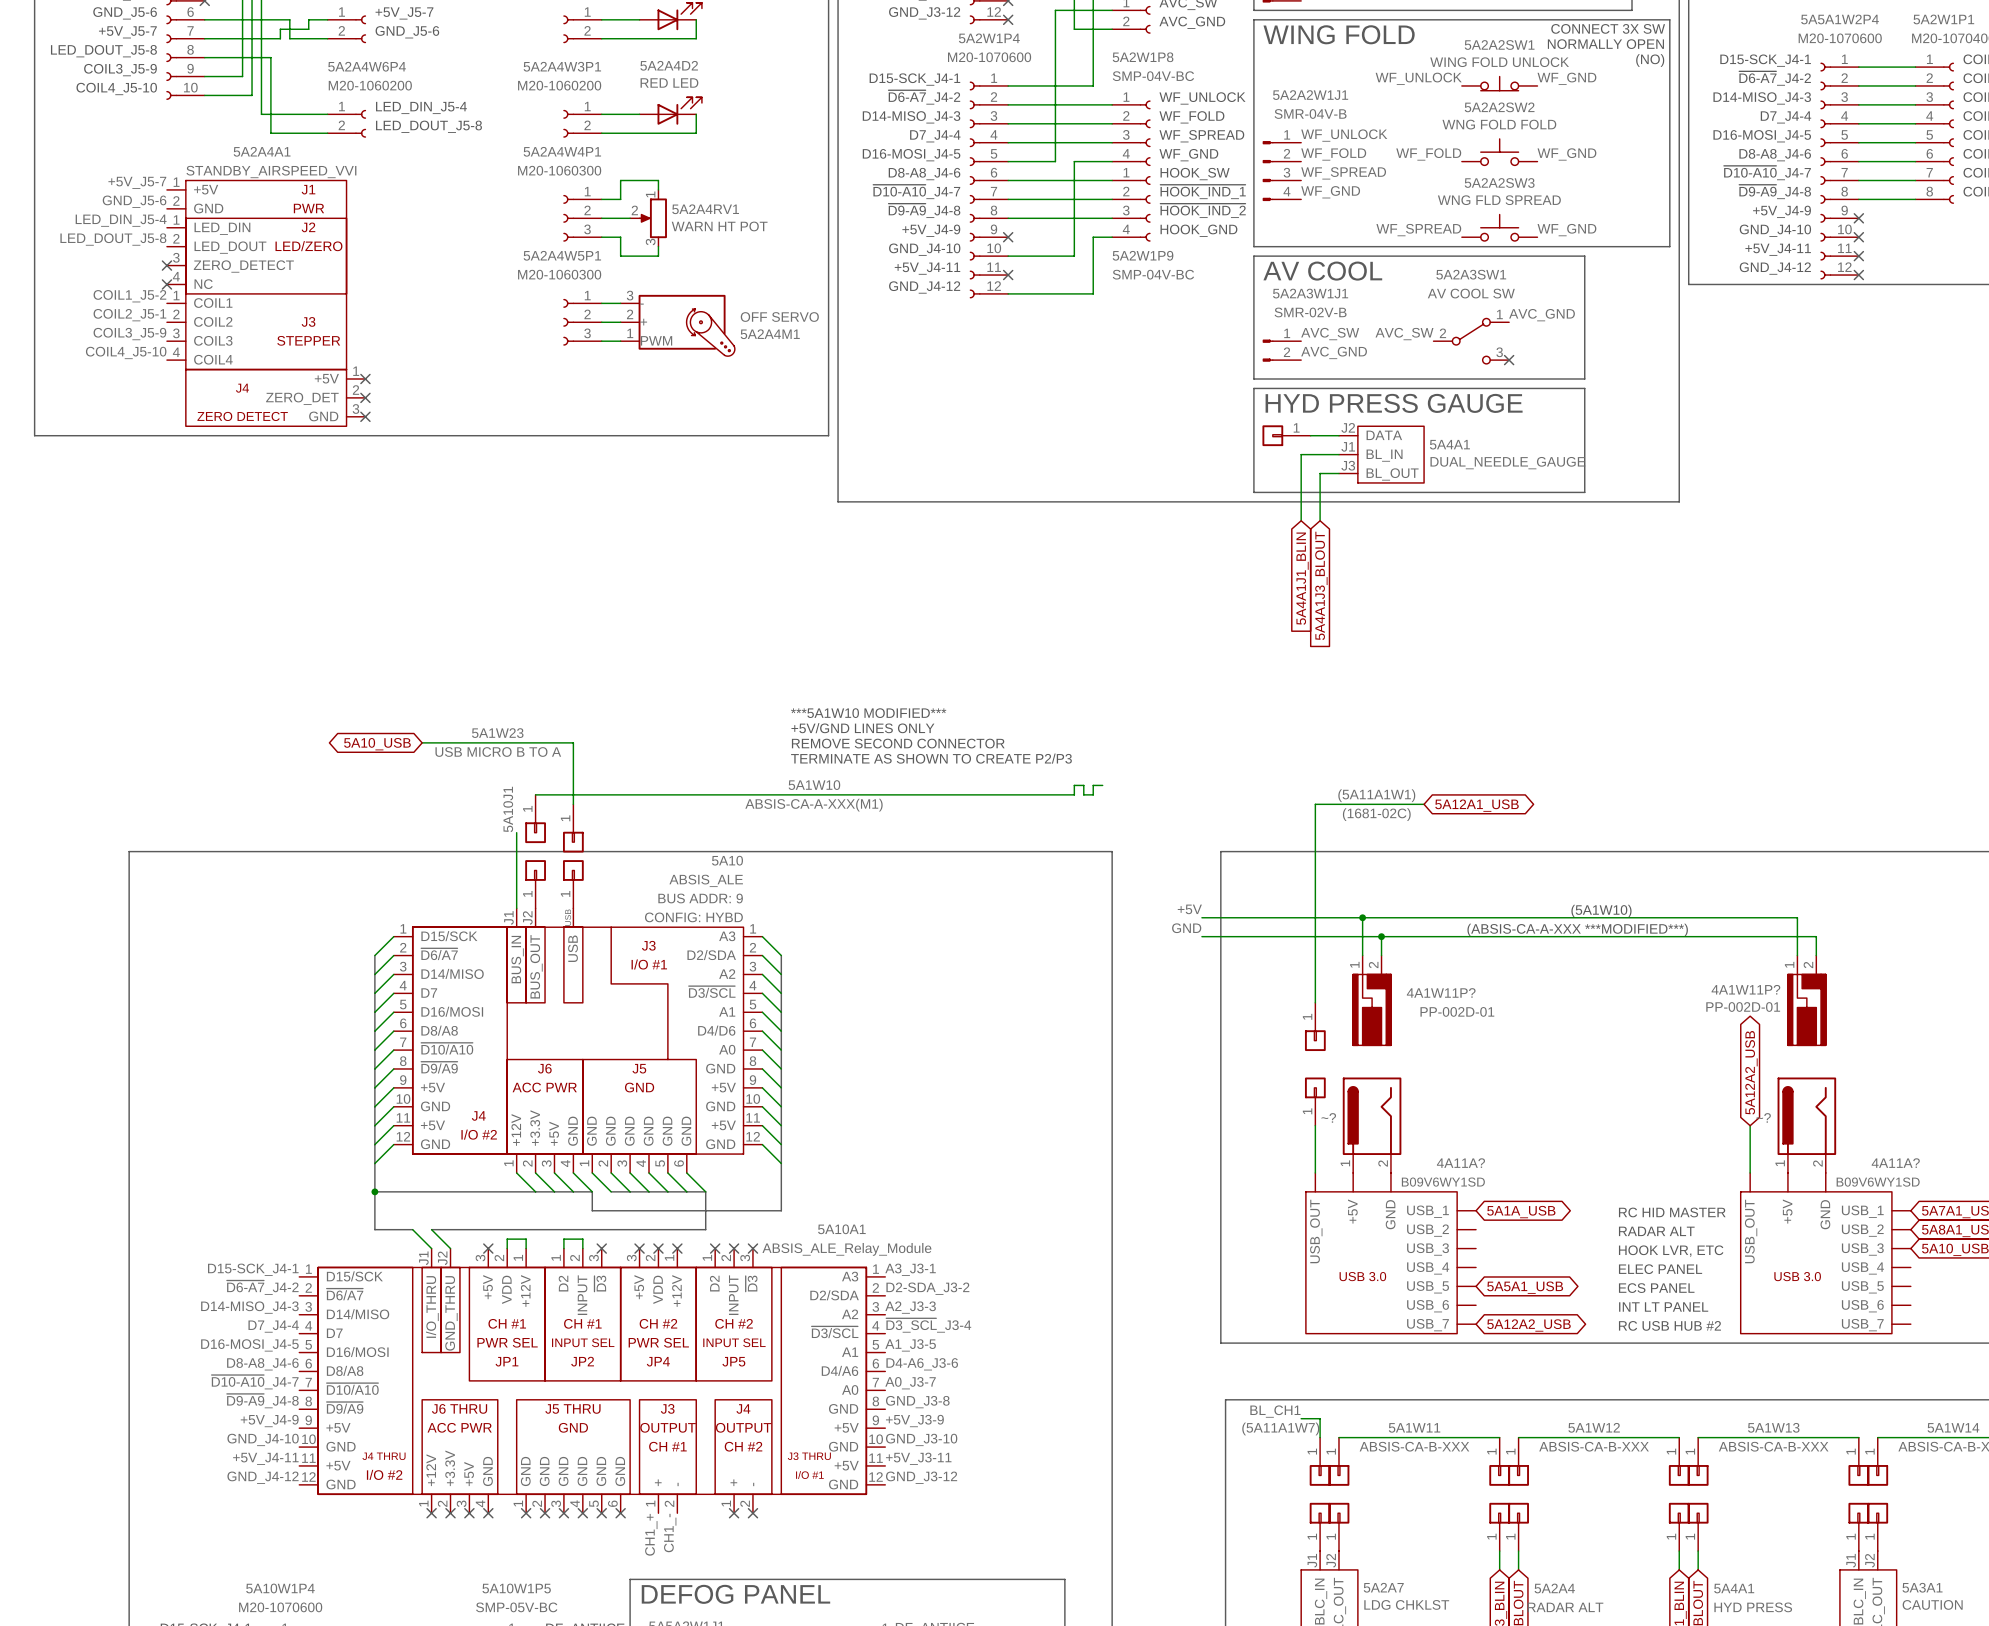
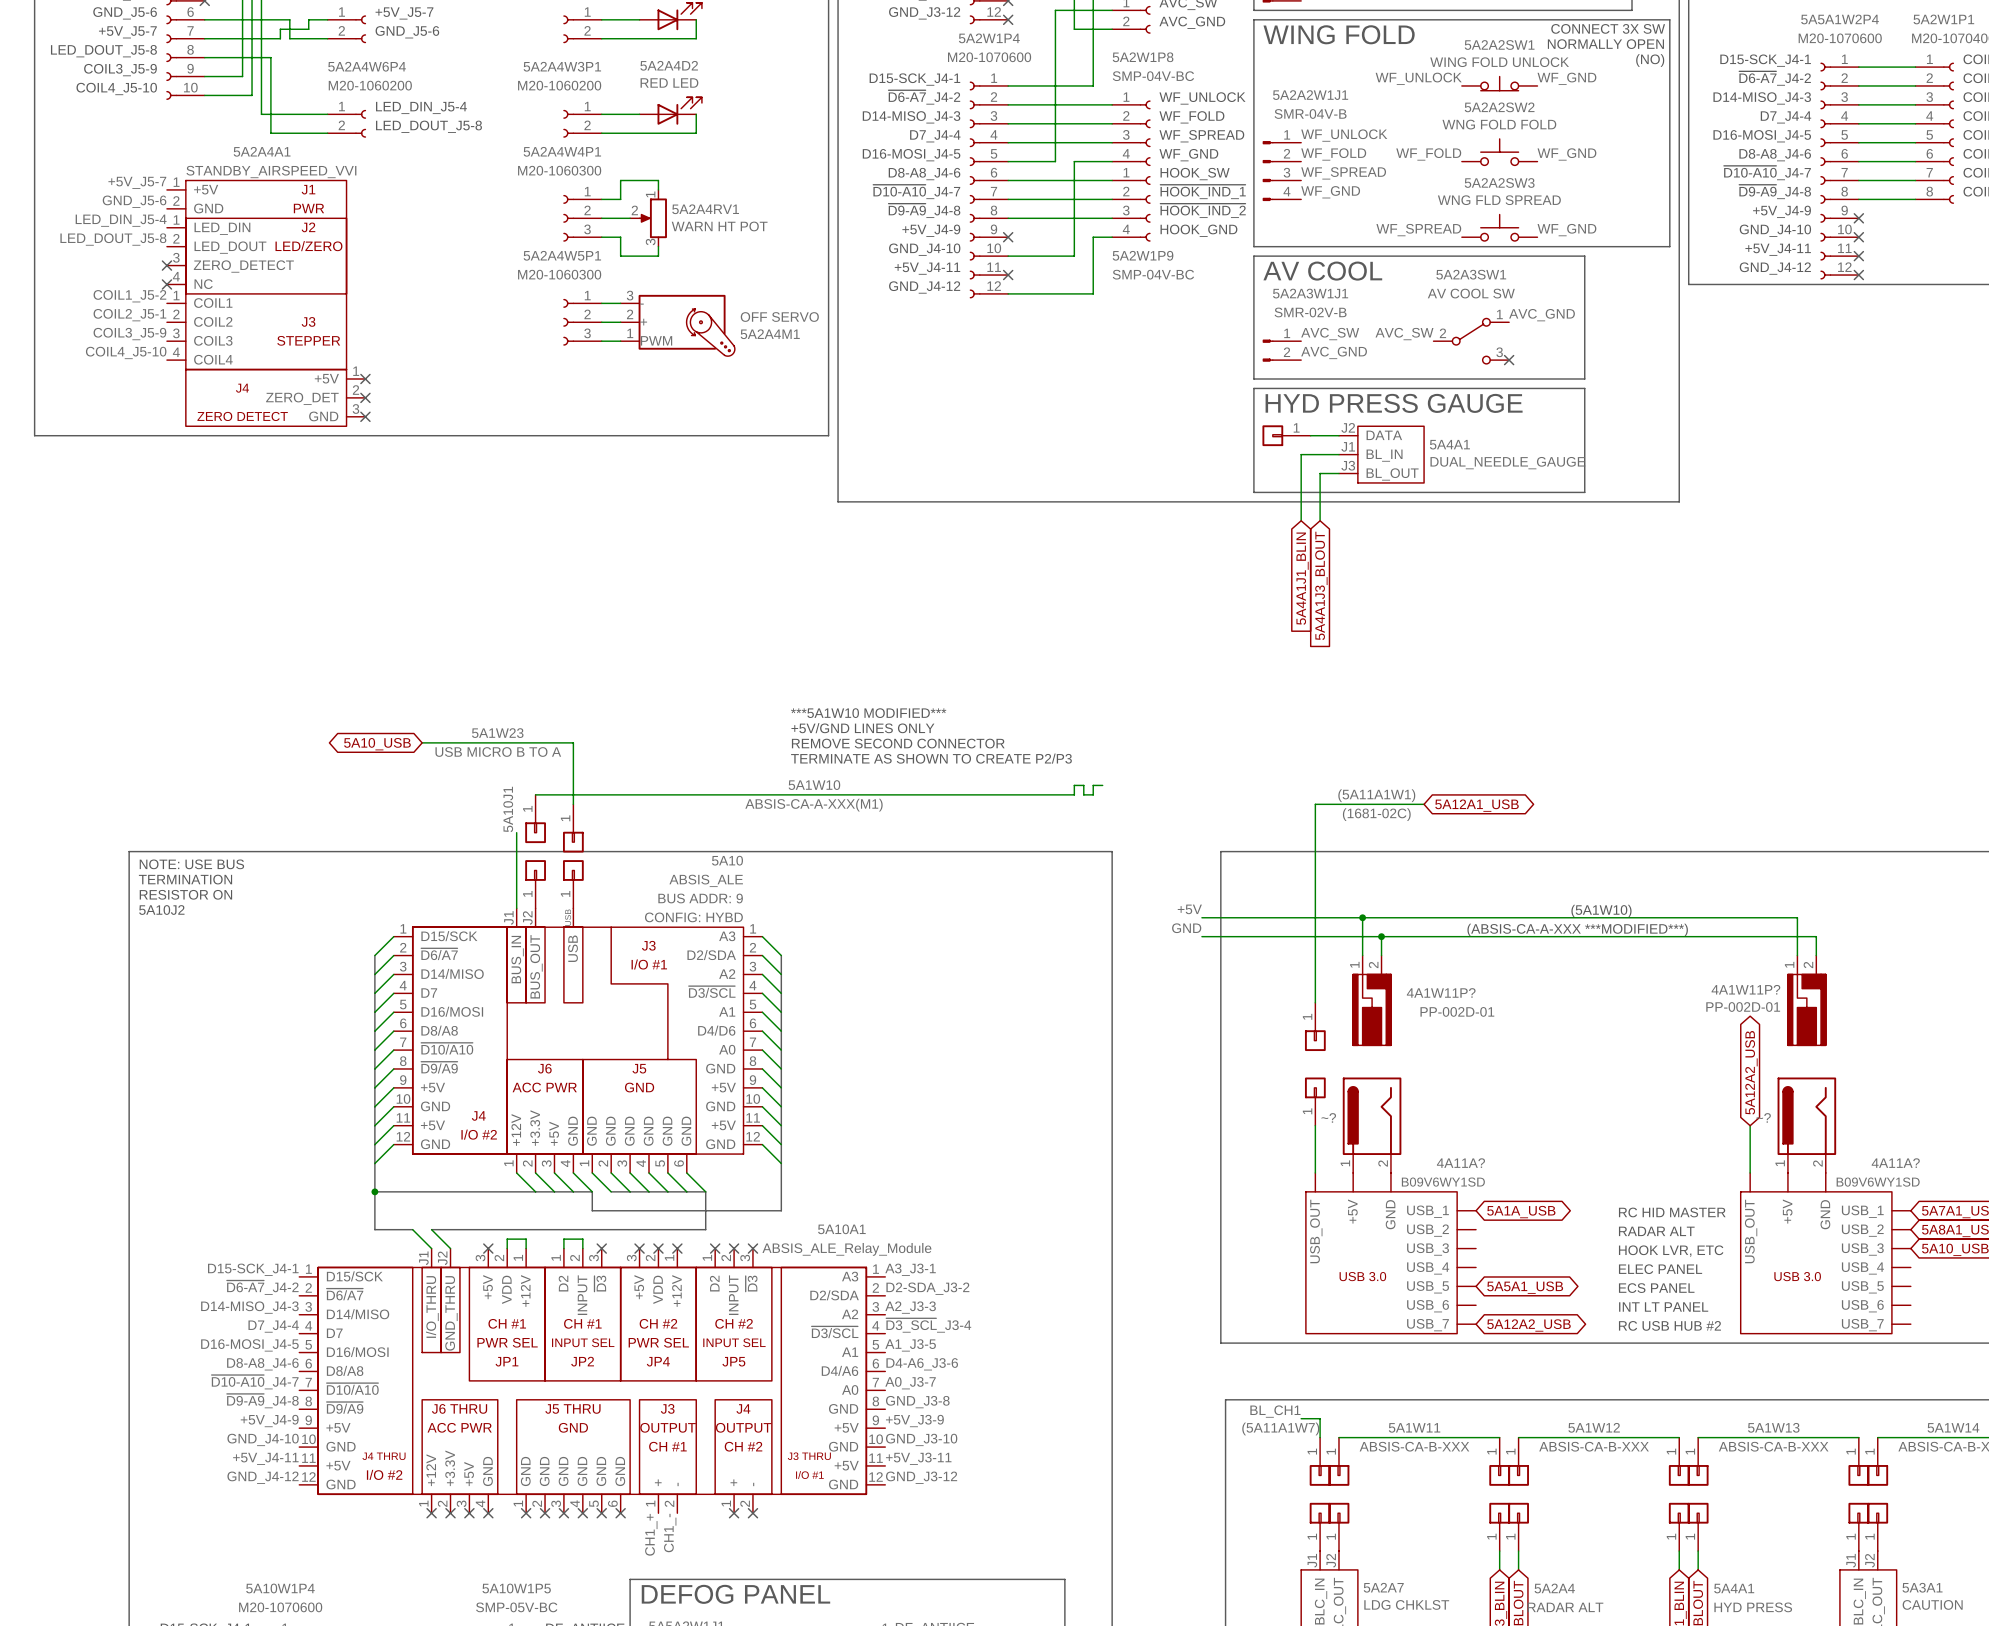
text: none -> NOTE: USE BUS (191, 864)
text: none -> TERMINATION (185, 879)
text: none -> RESISTOR ON (185, 894)
text: none -> 5A10J2 (161, 910)

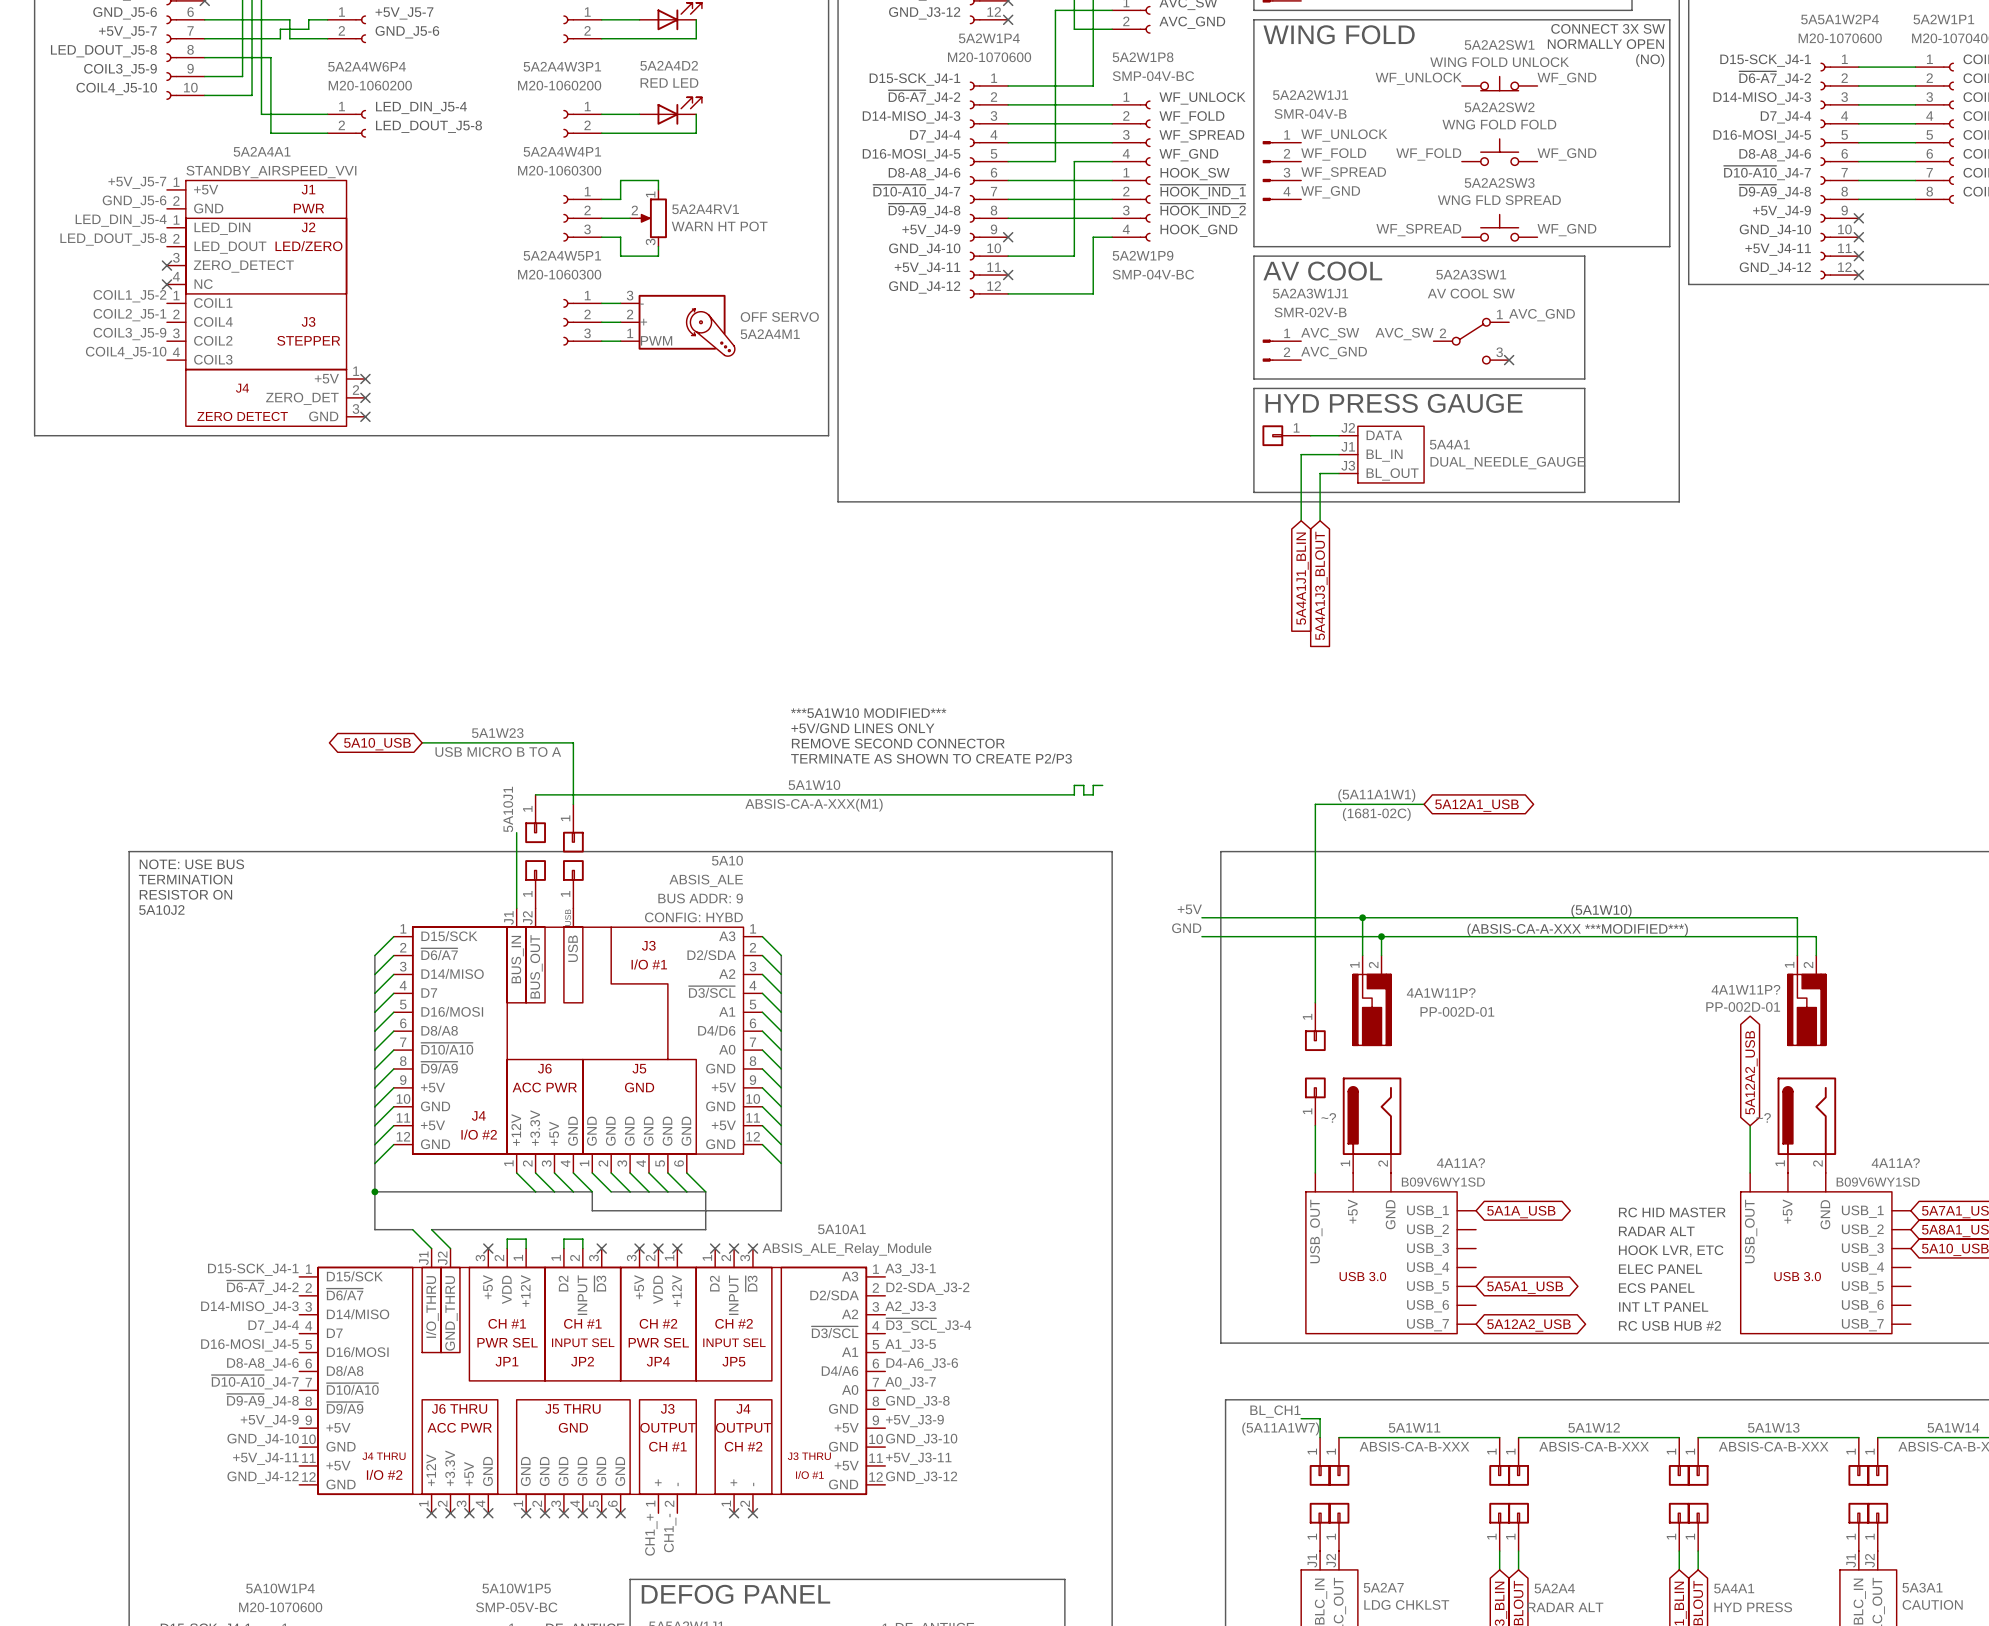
5A2A4A1 pin name: COIL2 (213, 321) -> COIL4 (213, 321)
5A2A4A1 pin name: COIL3 (213, 340) -> COIL2 (213, 340)
5A2A4A1 pin name: COIL4 (213, 359) -> COIL3 (213, 359)

